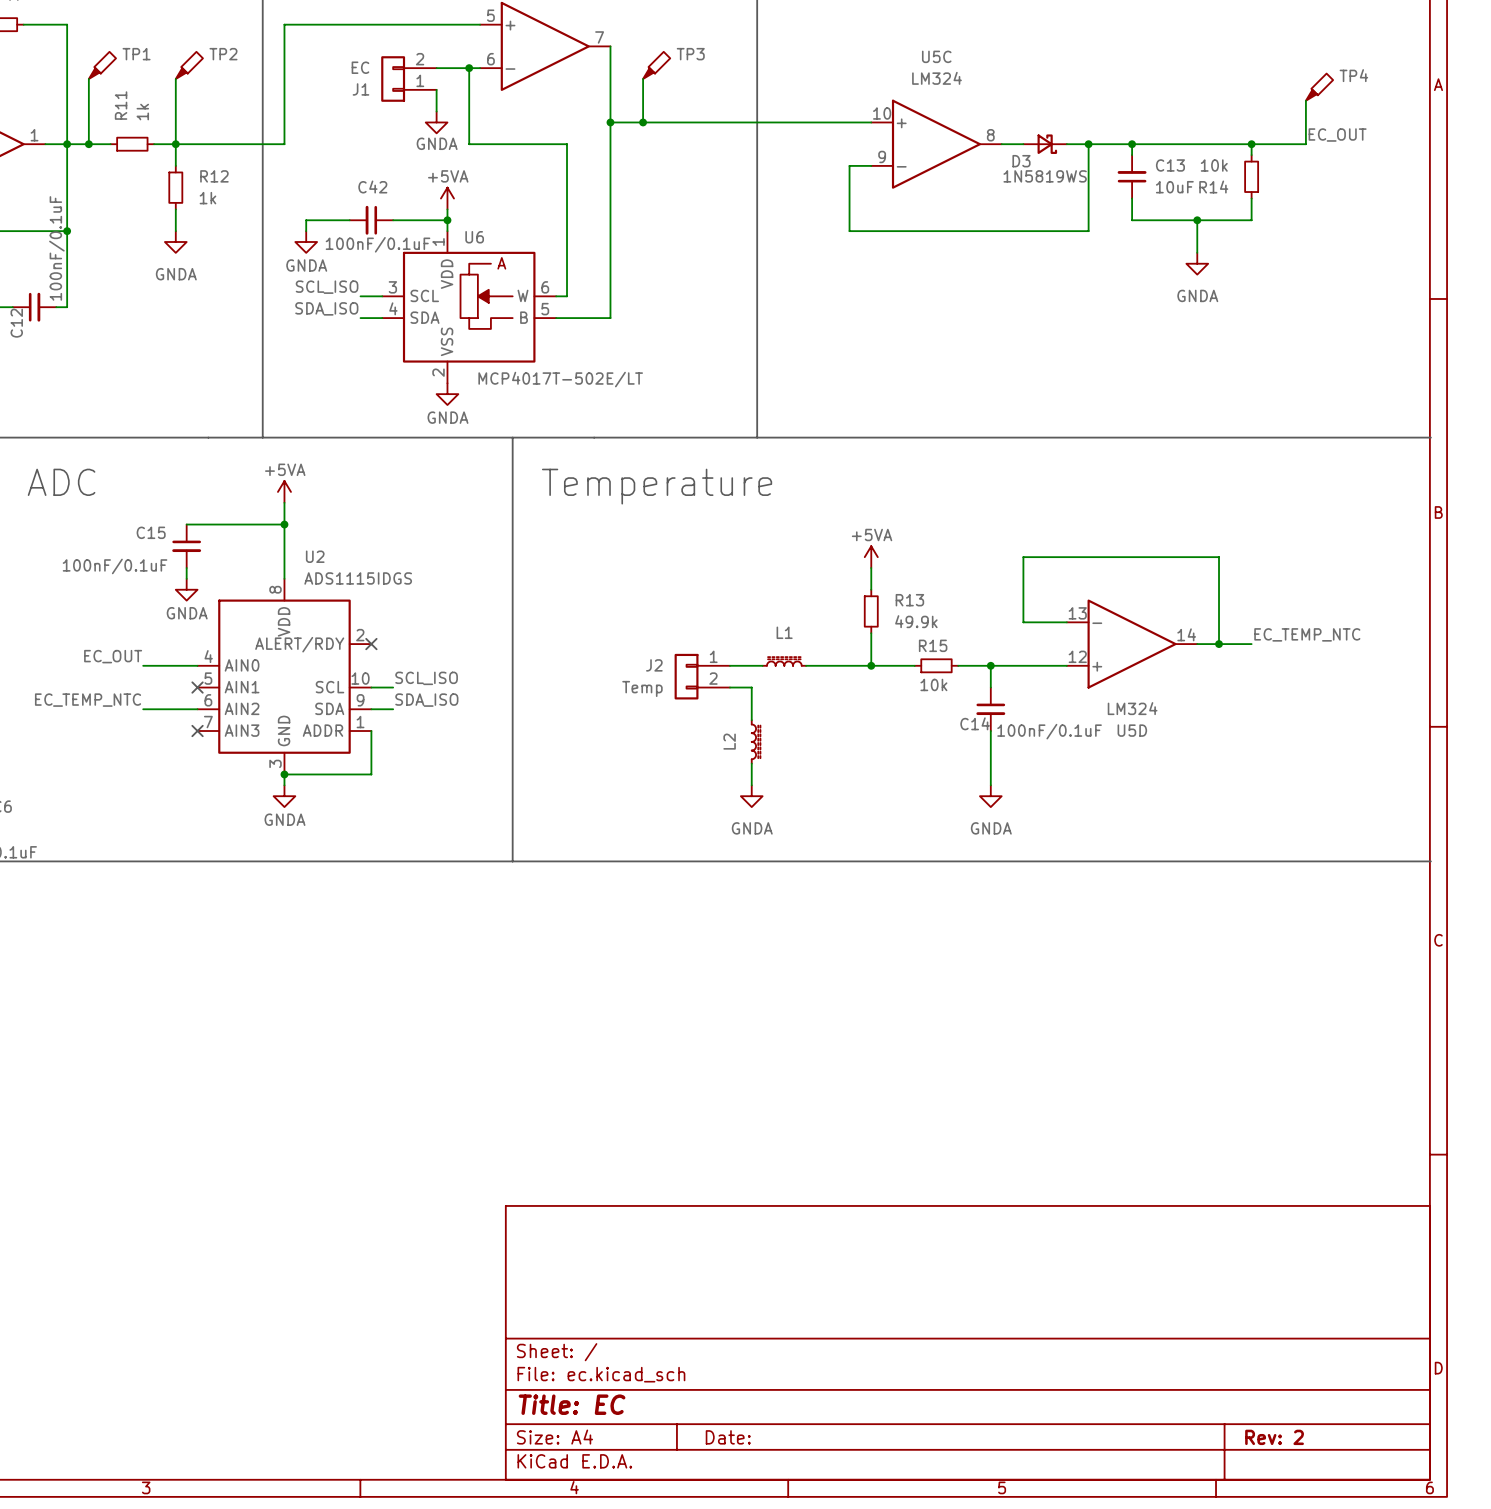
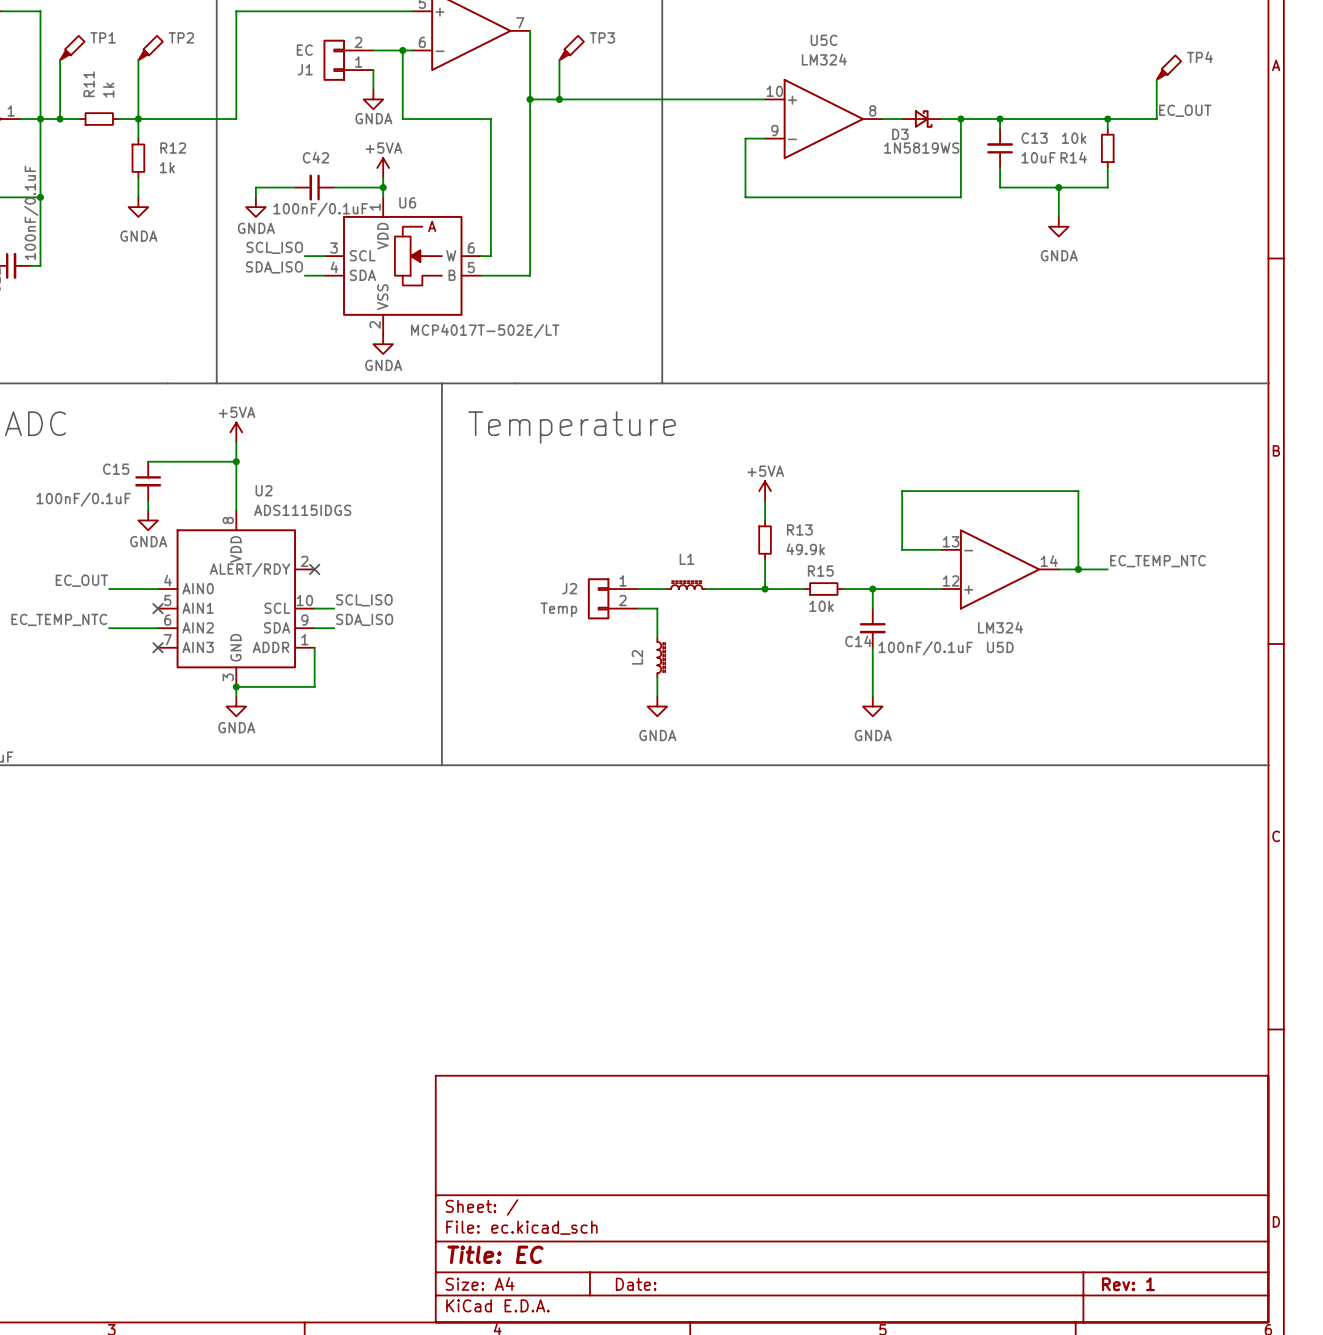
title block: Rev: 2 (1274, 1437) -> Rev: 1 (1128, 1284)

